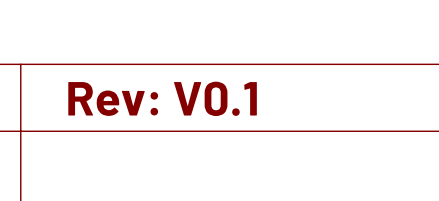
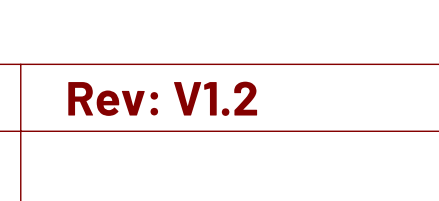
title block: Rev: V0.1 (162, 98) -> Rev: V1.2 (162, 98)

